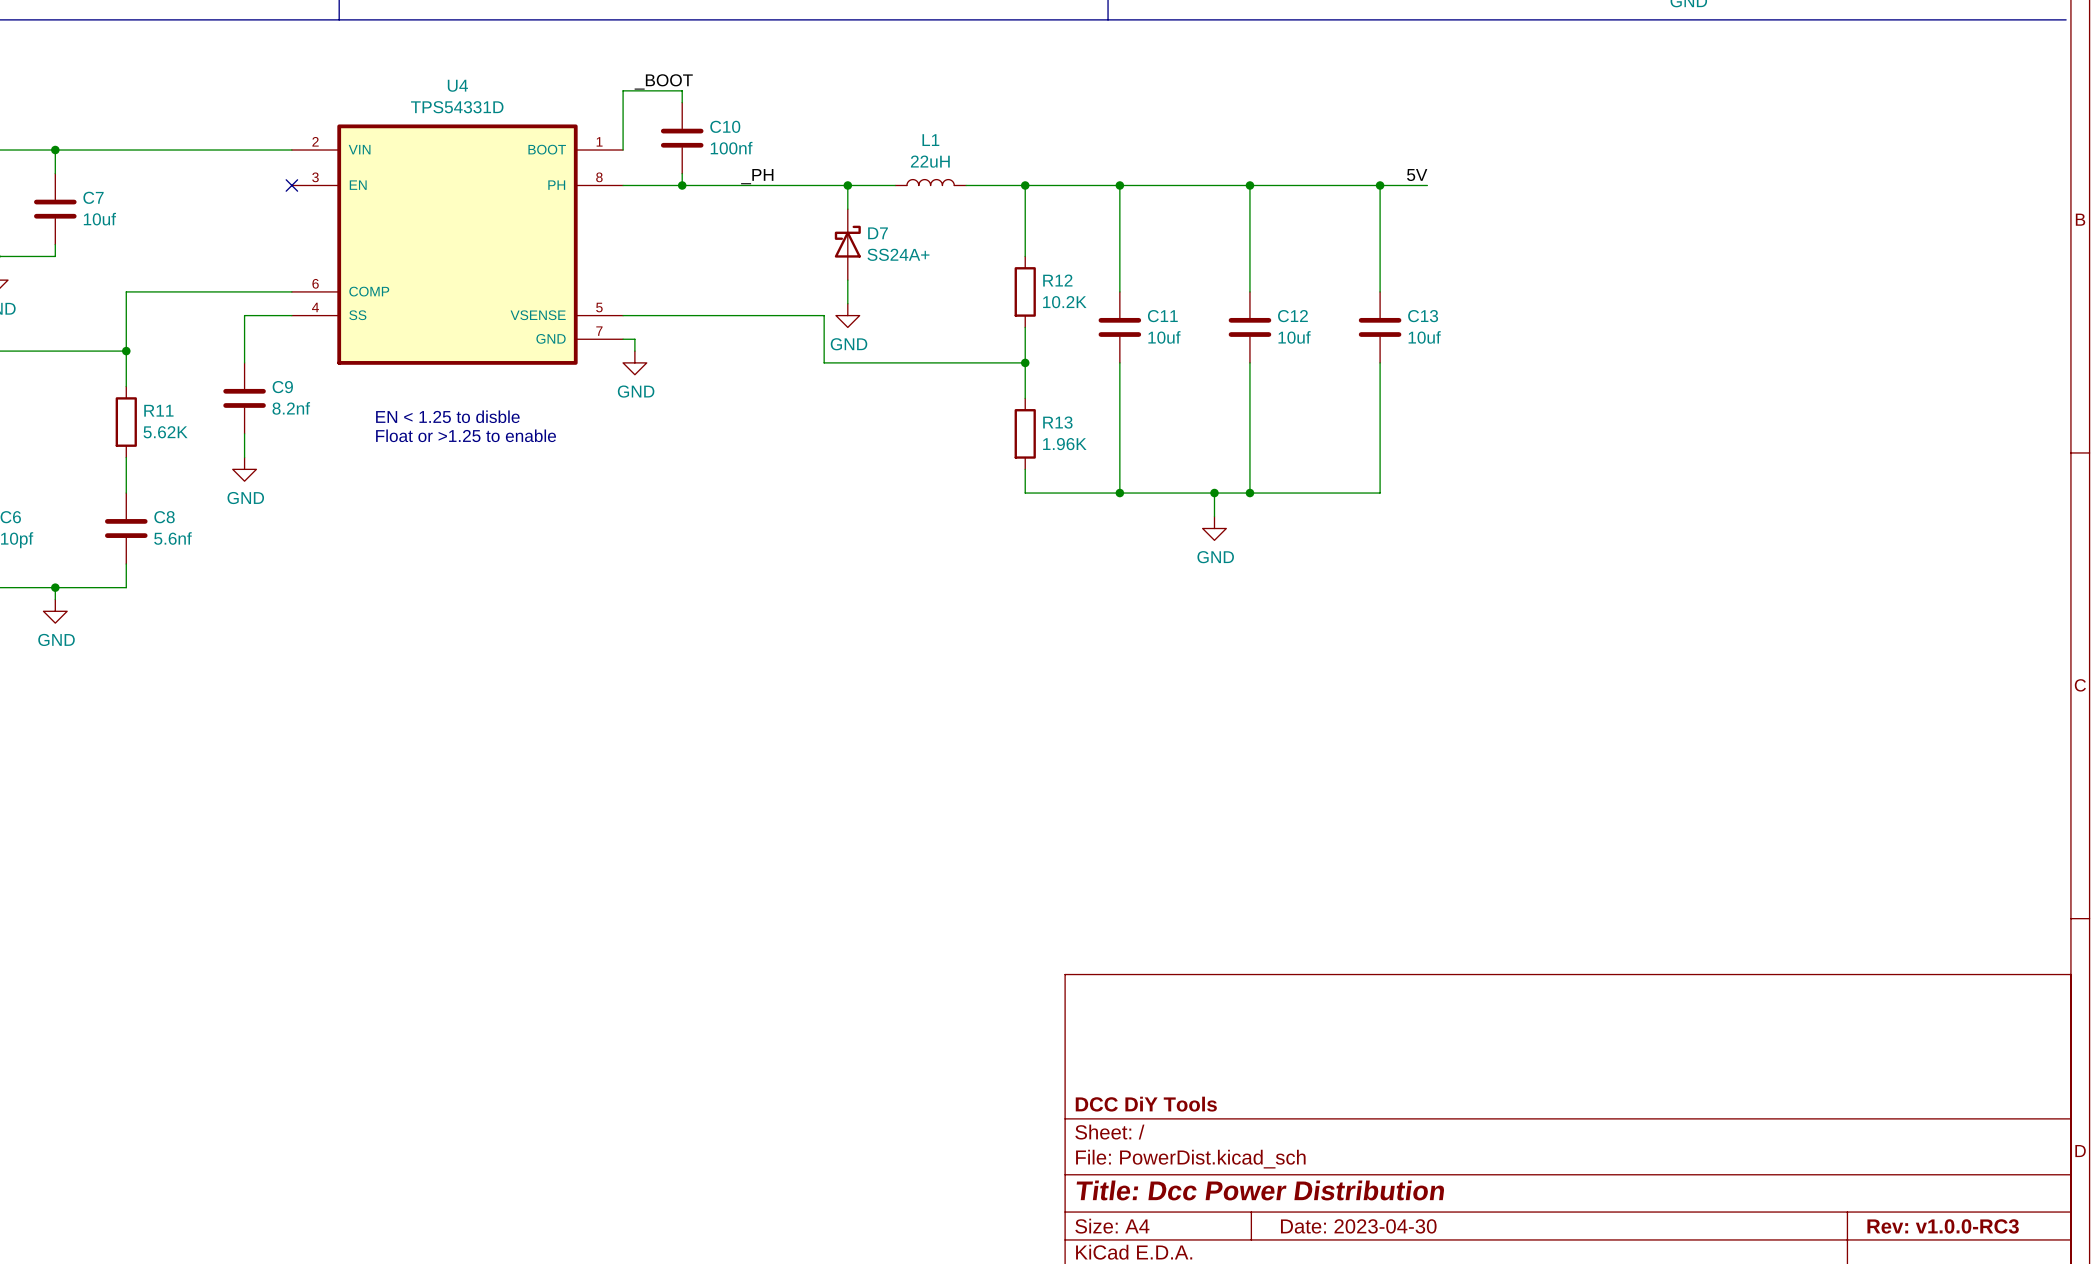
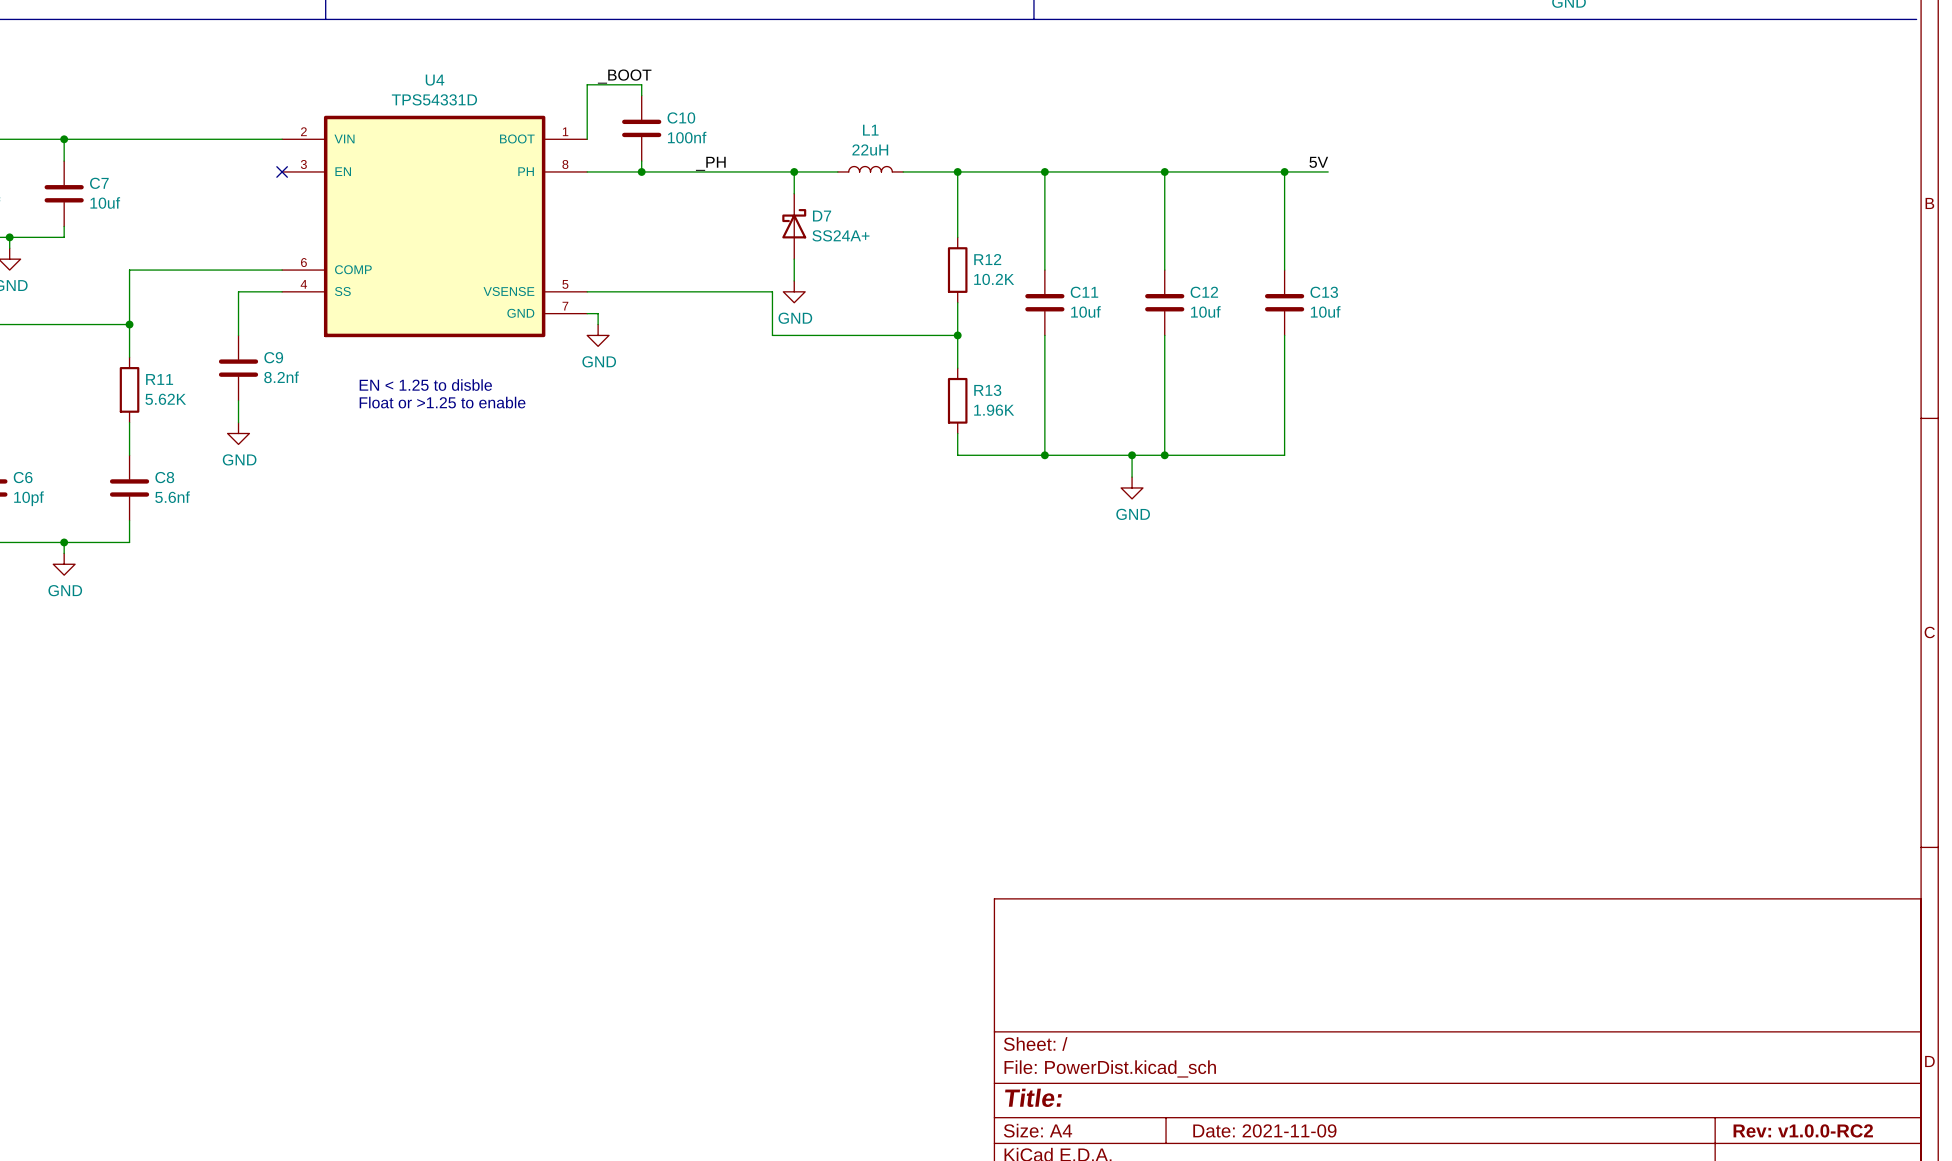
title block: DCC DiY Tools (1146, 1104) -> none
title block: Title: Dcc Power Distribution (1260, 1190) -> Title: (1033, 1097)
title block: Date: 2023-04-30 (1358, 1226) -> Date: 2021-11-09 (1264, 1130)
title block: Rev: v1.0.0-RC3 (1943, 1226) -> Rev: v1.0.0-RC2 (1803, 1130)

